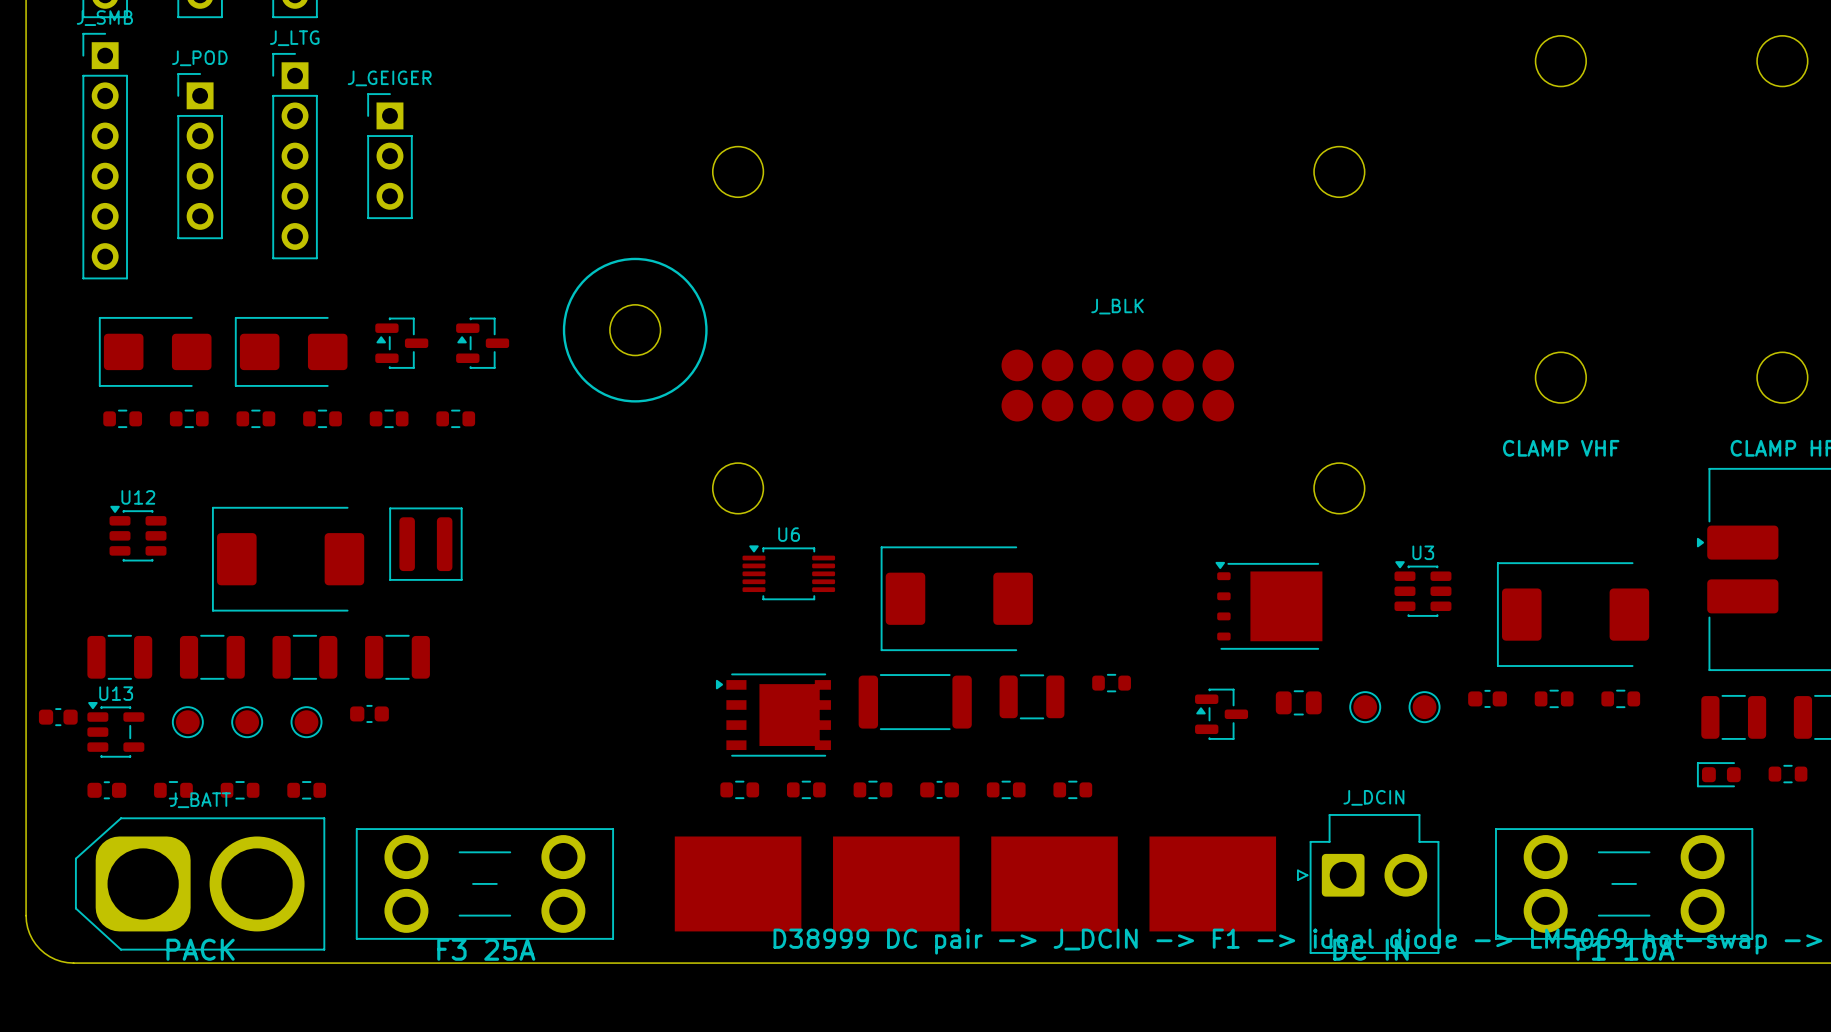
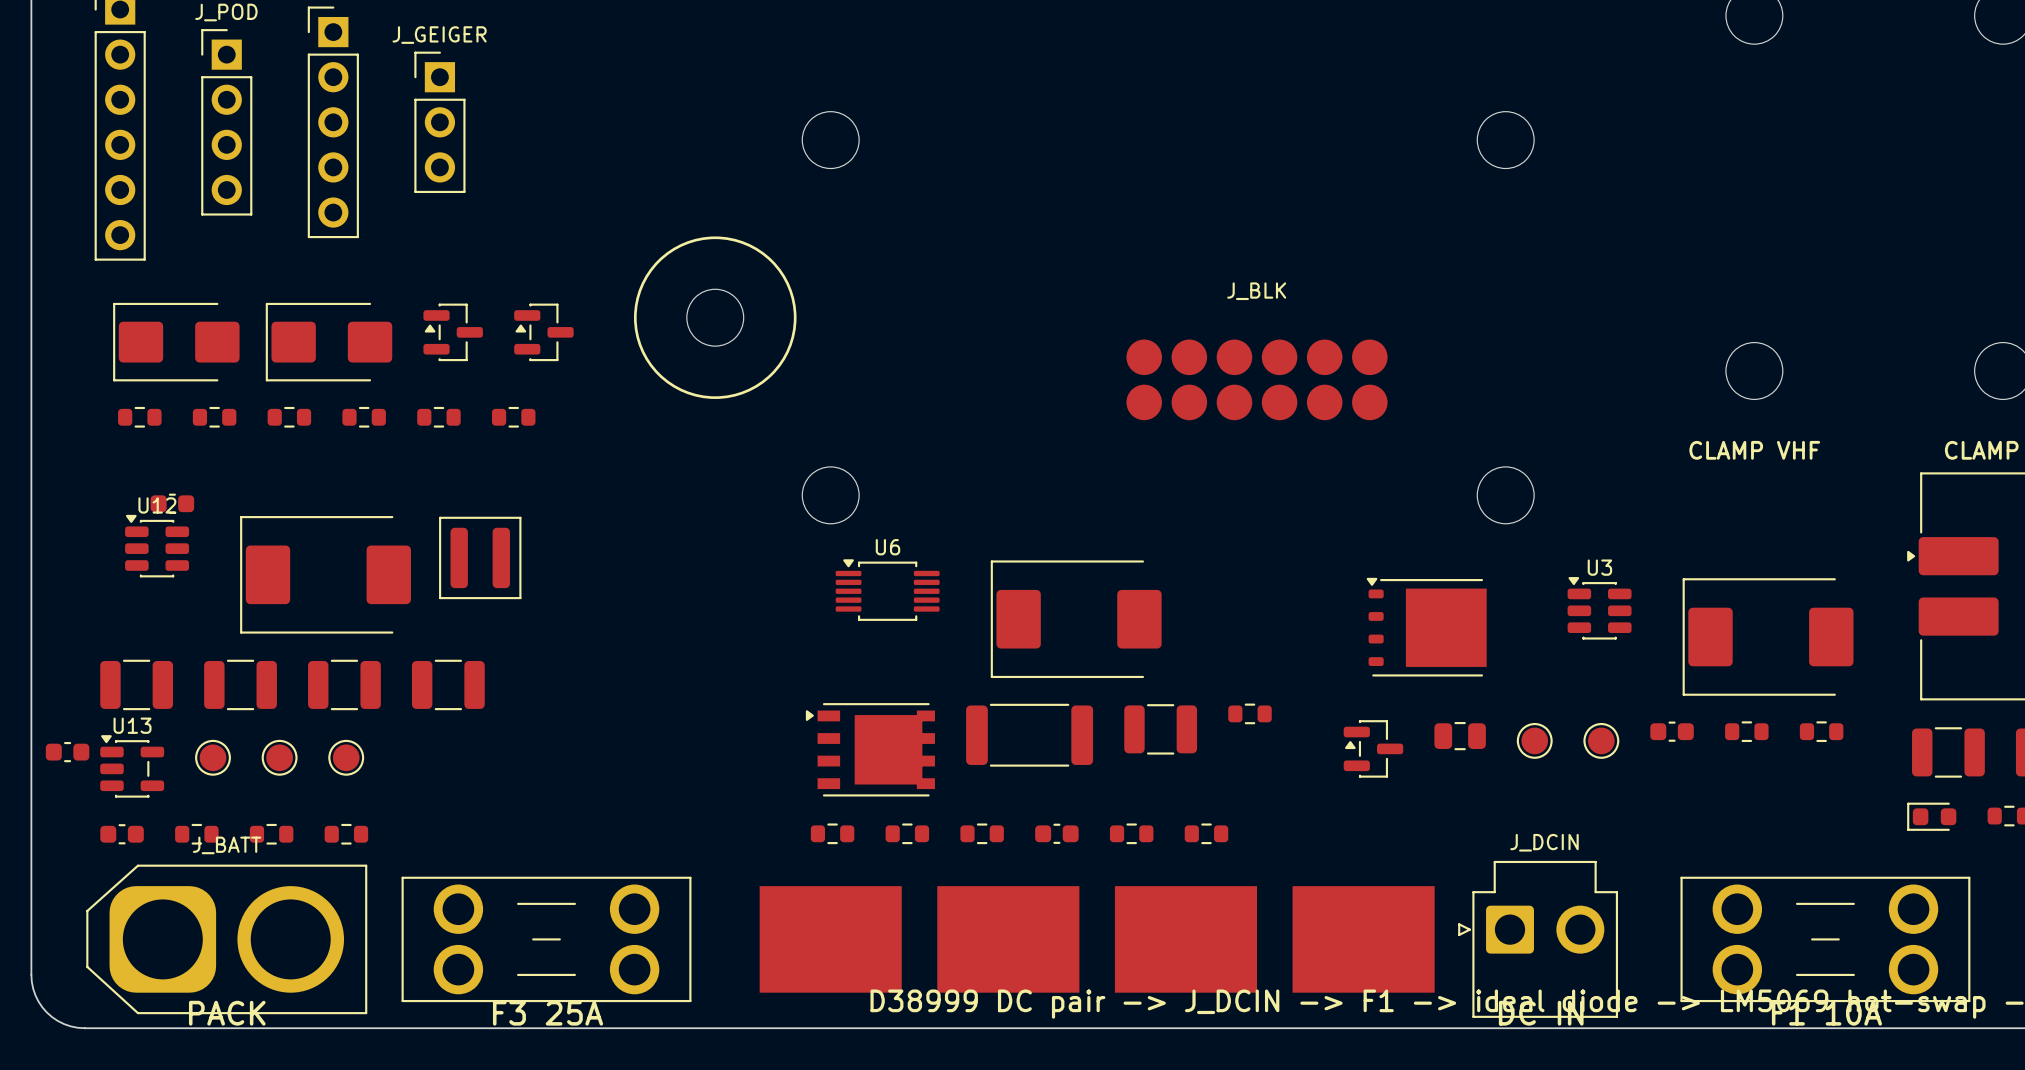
part position: (369, 713) -> (172, 503)

